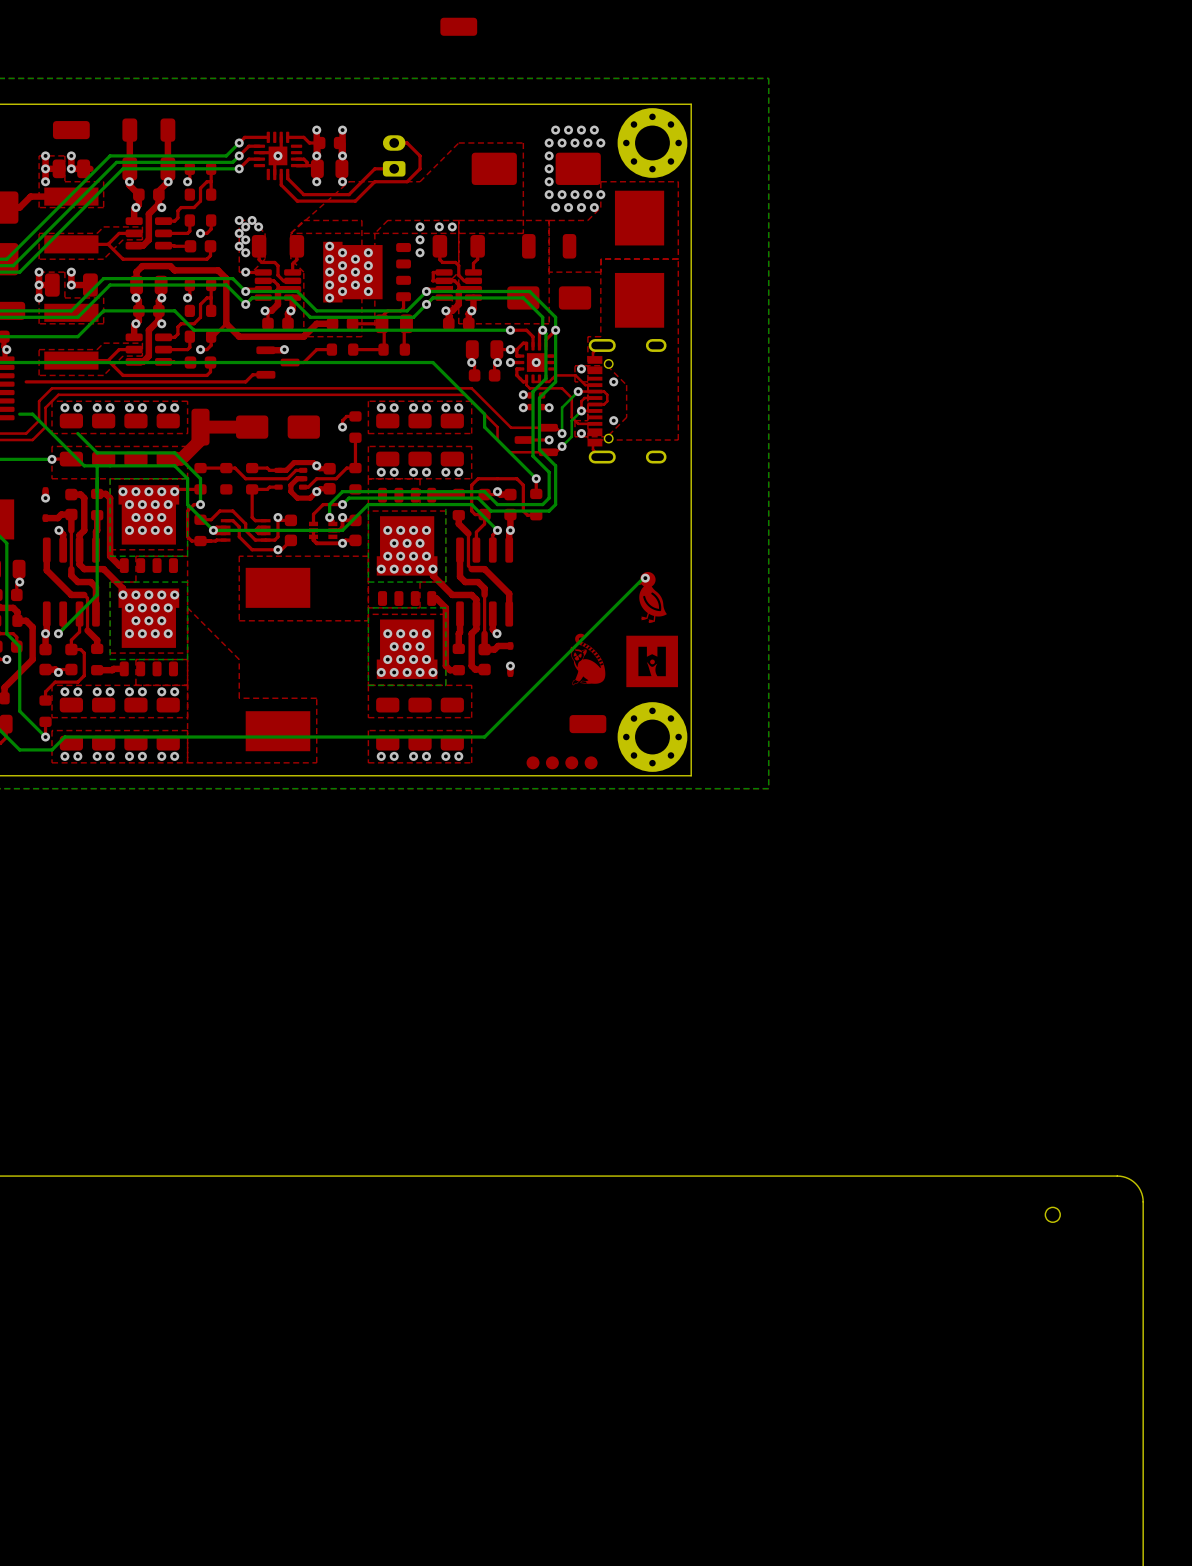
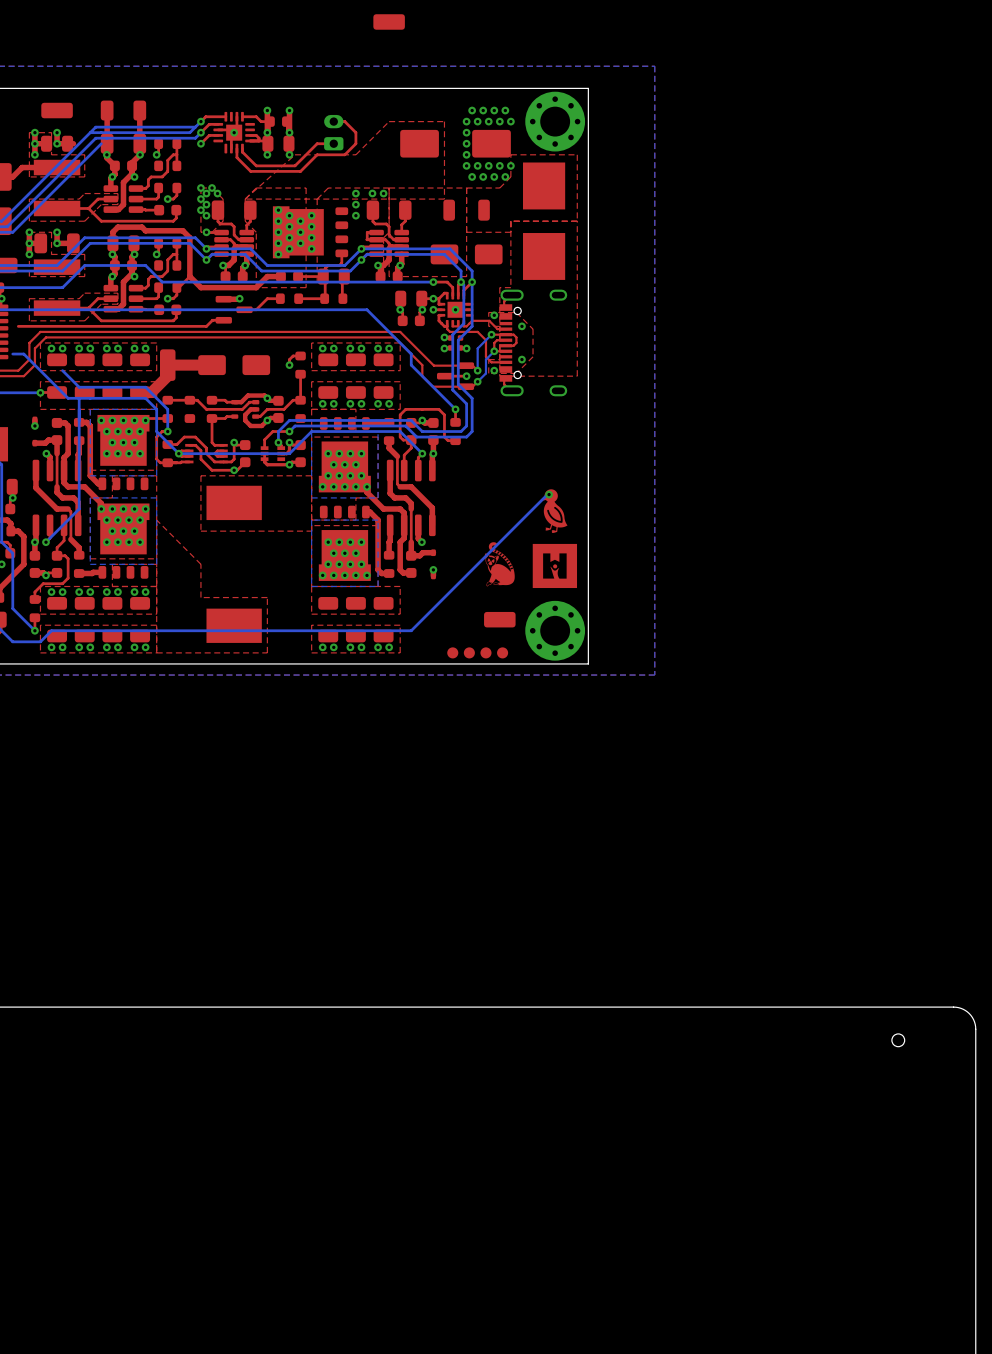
bottom track: none -> (195, 127) (95, 127) (90, 132)
bottom track: (239, 168) (123, 168) -> none

